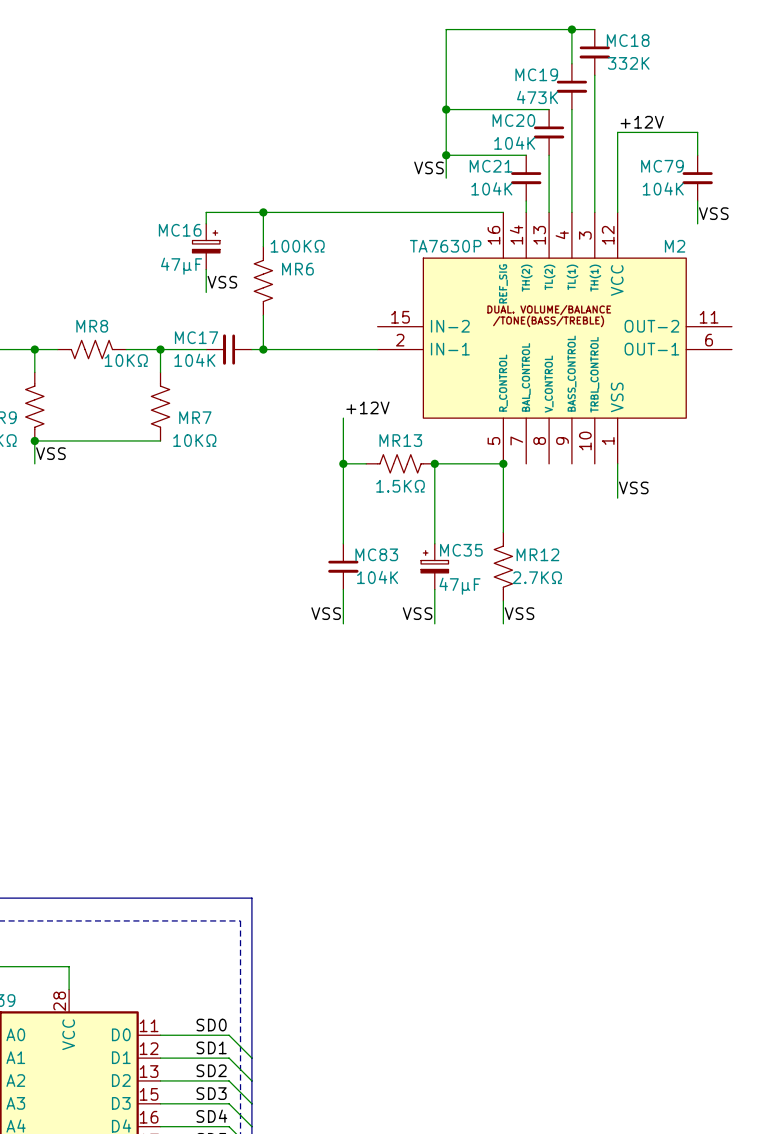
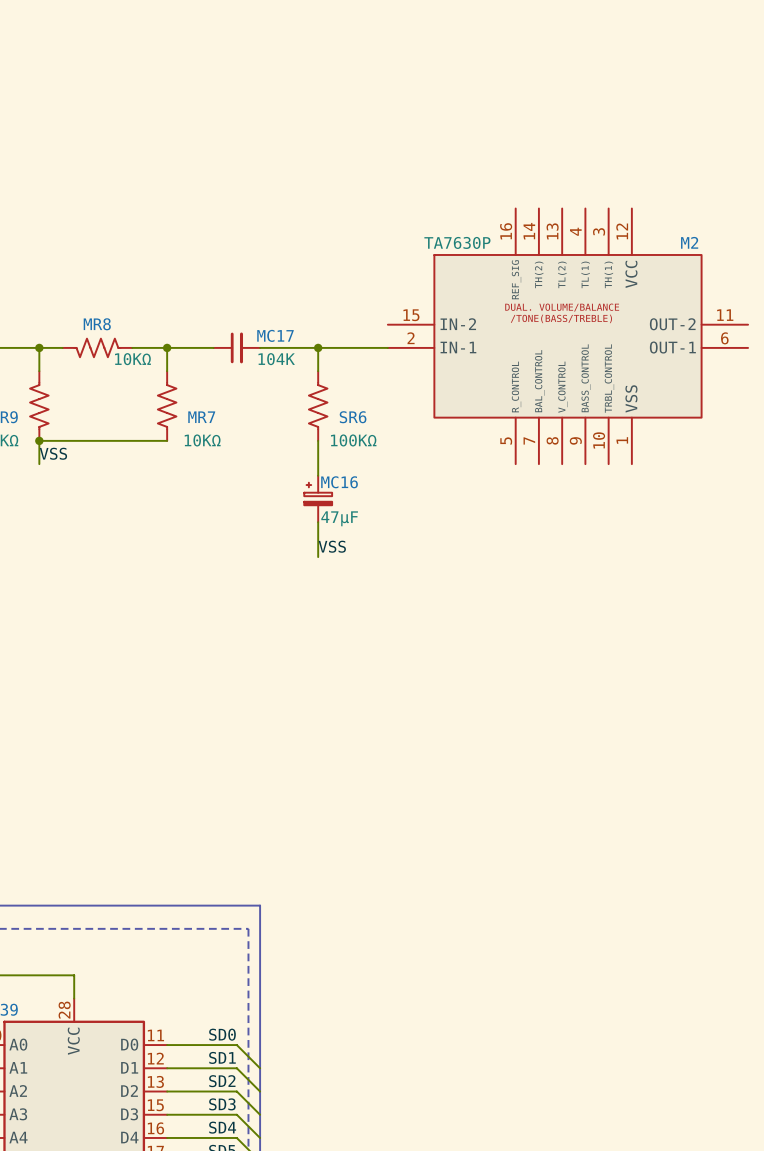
wire: (571, 29) (571, 63) -> none
junction: (571, 29) -> none
wire: (594, 29) (446, 29) (446, 178) -> none
MC18: 332K (594, 52) -> none
wire: (594, 75) (594, 212) -> none
MC19: 473K (571, 86) -> none
wire: (446, 109) (549, 109) -> none
junction: (446, 109) -> none
wire: (571, 109) (571, 212) -> none
label: +12V (642, 122) -> none
MC20: 104K (549, 132) -> none
wire: (446, 155) (526, 155) -> none
junction: (446, 155) -> none
wire: (549, 155) (549, 212) -> none
wire: (697, 155) (697, 132) (617, 132) (617, 212) -> none
label: VSS (428, 167) -> none
MC21: 104K (526, 178) -> none
MC79: 104K (697, 178) -> none
wire: (526, 200) (526, 212) -> none
wire: (697, 200) (697, 223) -> none
wire: (263, 212) (263, 246) -> none
junction: (263, 212) -> none
wire: (503, 212) (206, 212) (206, 223) -> none
label: VSS (713, 213) -> none
MC16 flip: as is (206, 241) -> left-right (318, 493)
MC16 position: (206, 246) -> (318, 498)
wire: (206, 269) (206, 292) -> (318, 347) (318, 371)
MR6: 100KΩ (263, 280) -> none
label: VSS (222, 282) -> none
wire: (263, 315) (263, 349) -> (318, 440) (318, 475)
MC17 name position: MC17 (196, 337) -> MC17 (275, 335)
MC17 rotation: 0° (229, 349) -> 180° (236, 347)
junction position: (263, 349) -> (318, 347)
MC17 value position: 104K (194, 360) -> 104K (276, 359)
SR6: none -> 100KΩ (318, 406)
label: +12V (367, 407) -> none
wire: (343, 418) (343, 543) -> none
wire: (343, 463) (366, 463) -> none
junction: (343, 463) -> none
MR13: 1.5KΩ (400, 463) -> none
junction: (434, 463) -> none
junction: (503, 463) -> none
wire: (617, 463) (617, 498) -> none
label: VSS (633, 487) -> none
wire: (503, 532) (503, 463) (434, 463) (434, 543) -> none
label: none -> VSS (332, 546)
MC83: 104K (343, 566) -> none
MC35: 47µF (434, 566) -> none
MR12: 2.7KΩ (503, 566) -> none
wire: (343, 589) (343, 623) -> (318, 522) (318, 557)
wire: (434, 589) (434, 623) -> none
wire: (503, 600) (503, 623) -> none
label: VSS (326, 613) -> none
label: VSS (417, 613) -> none
label: VSS (519, 613) -> none

